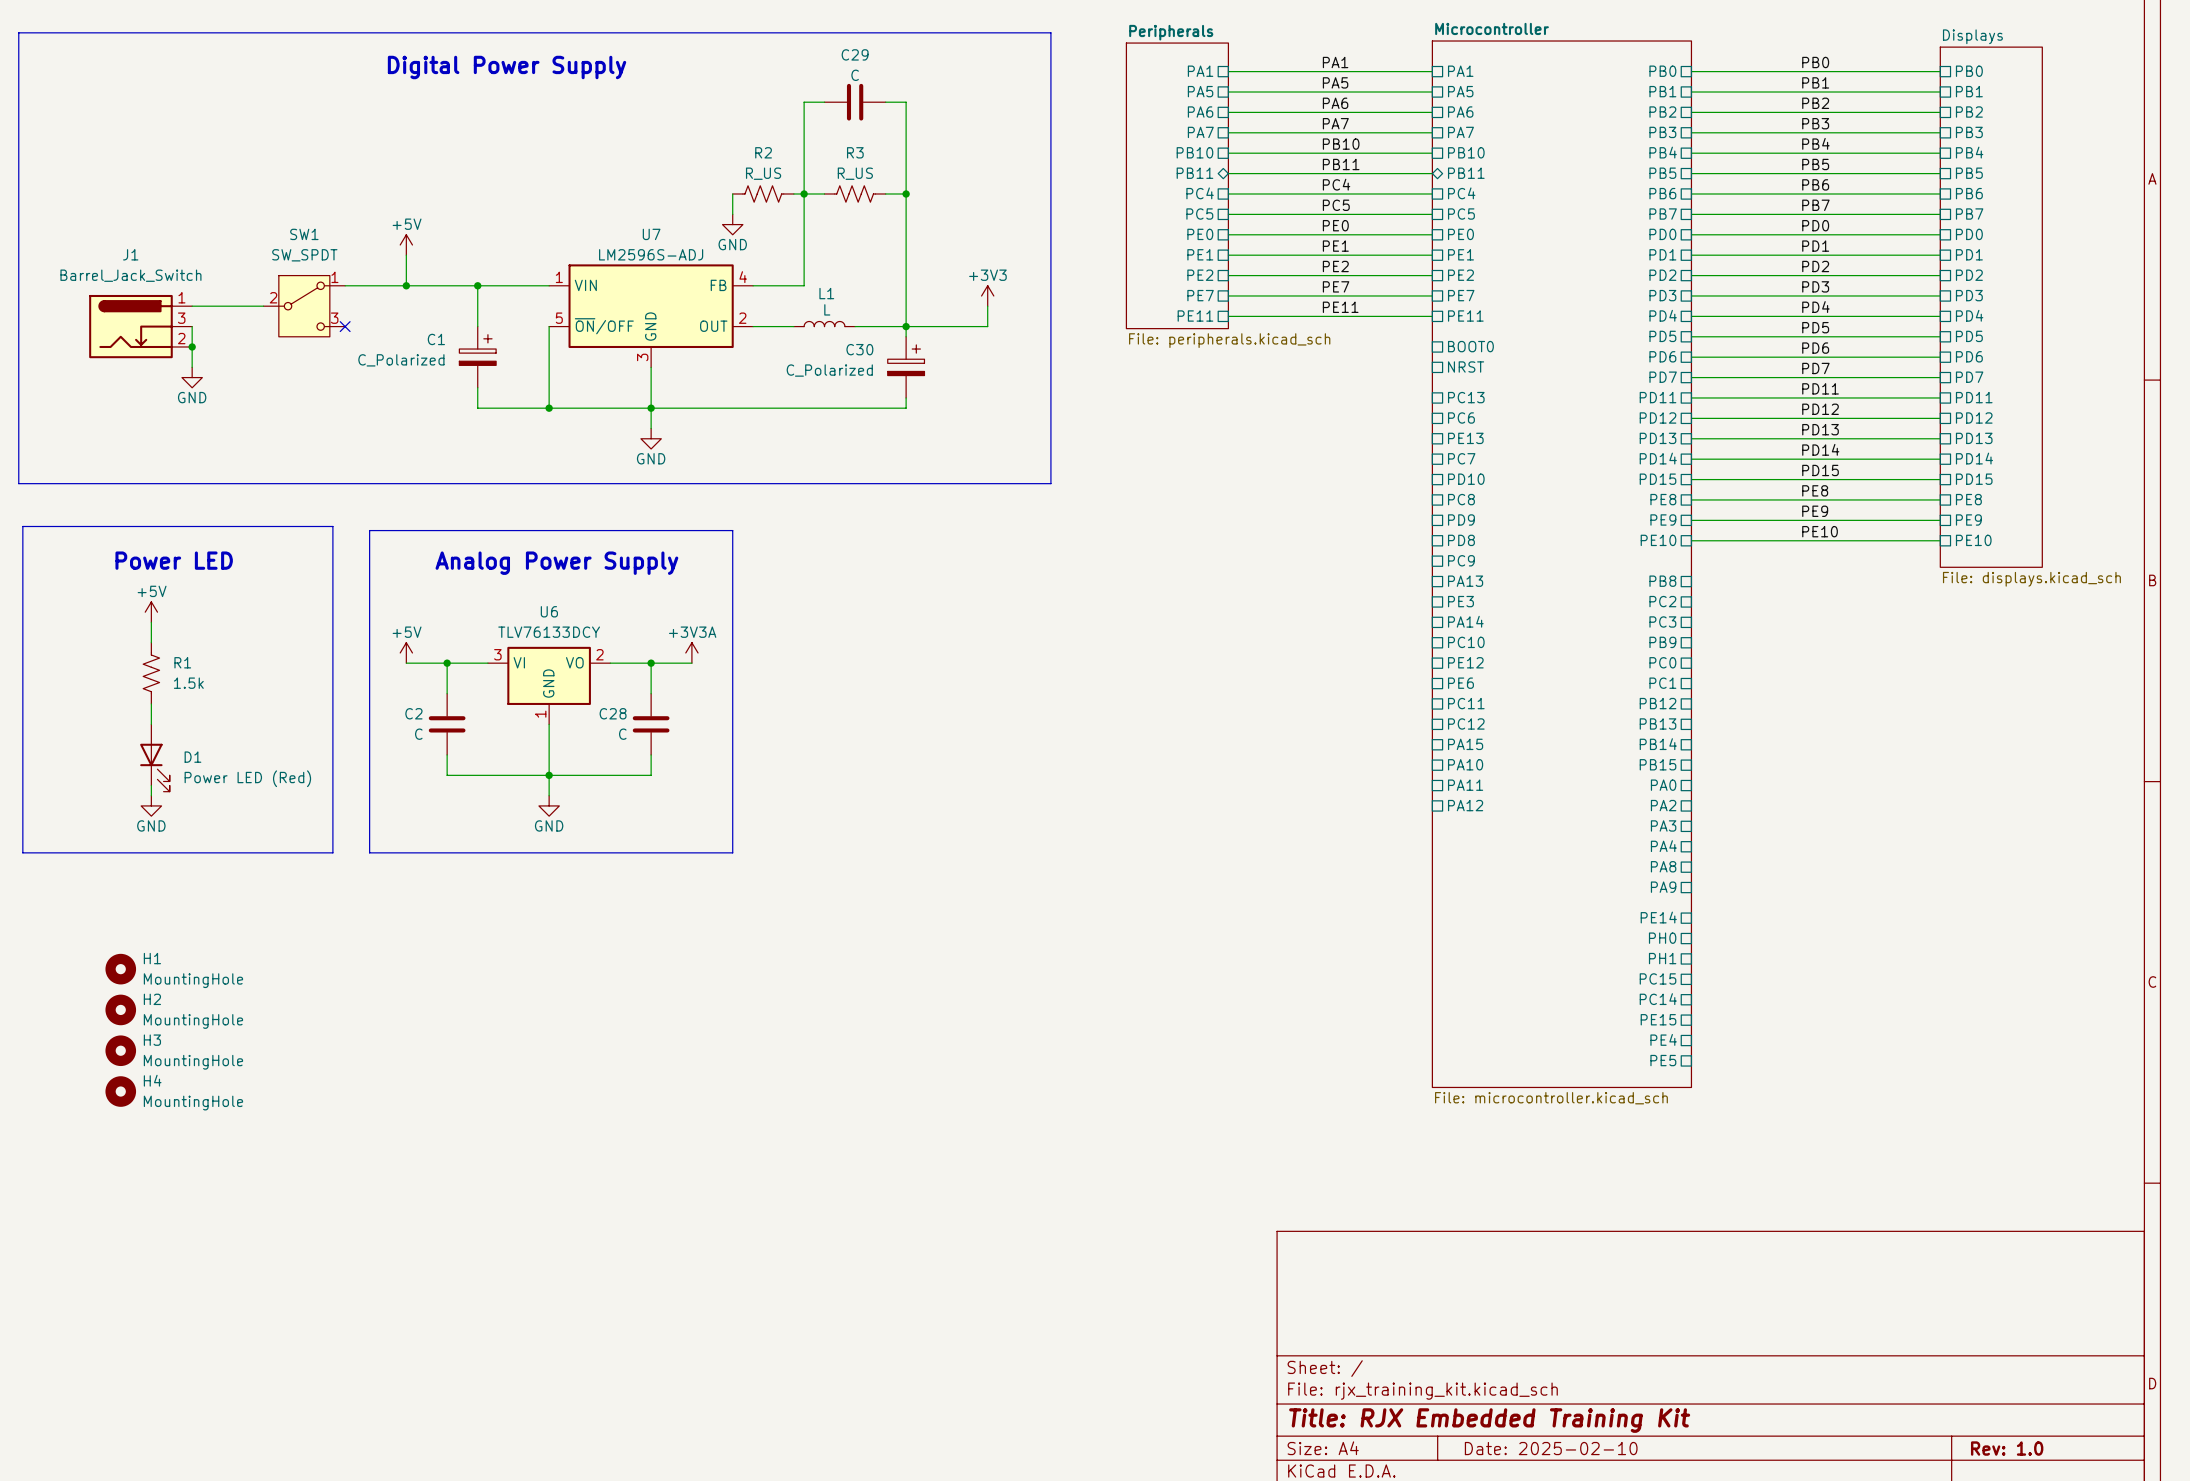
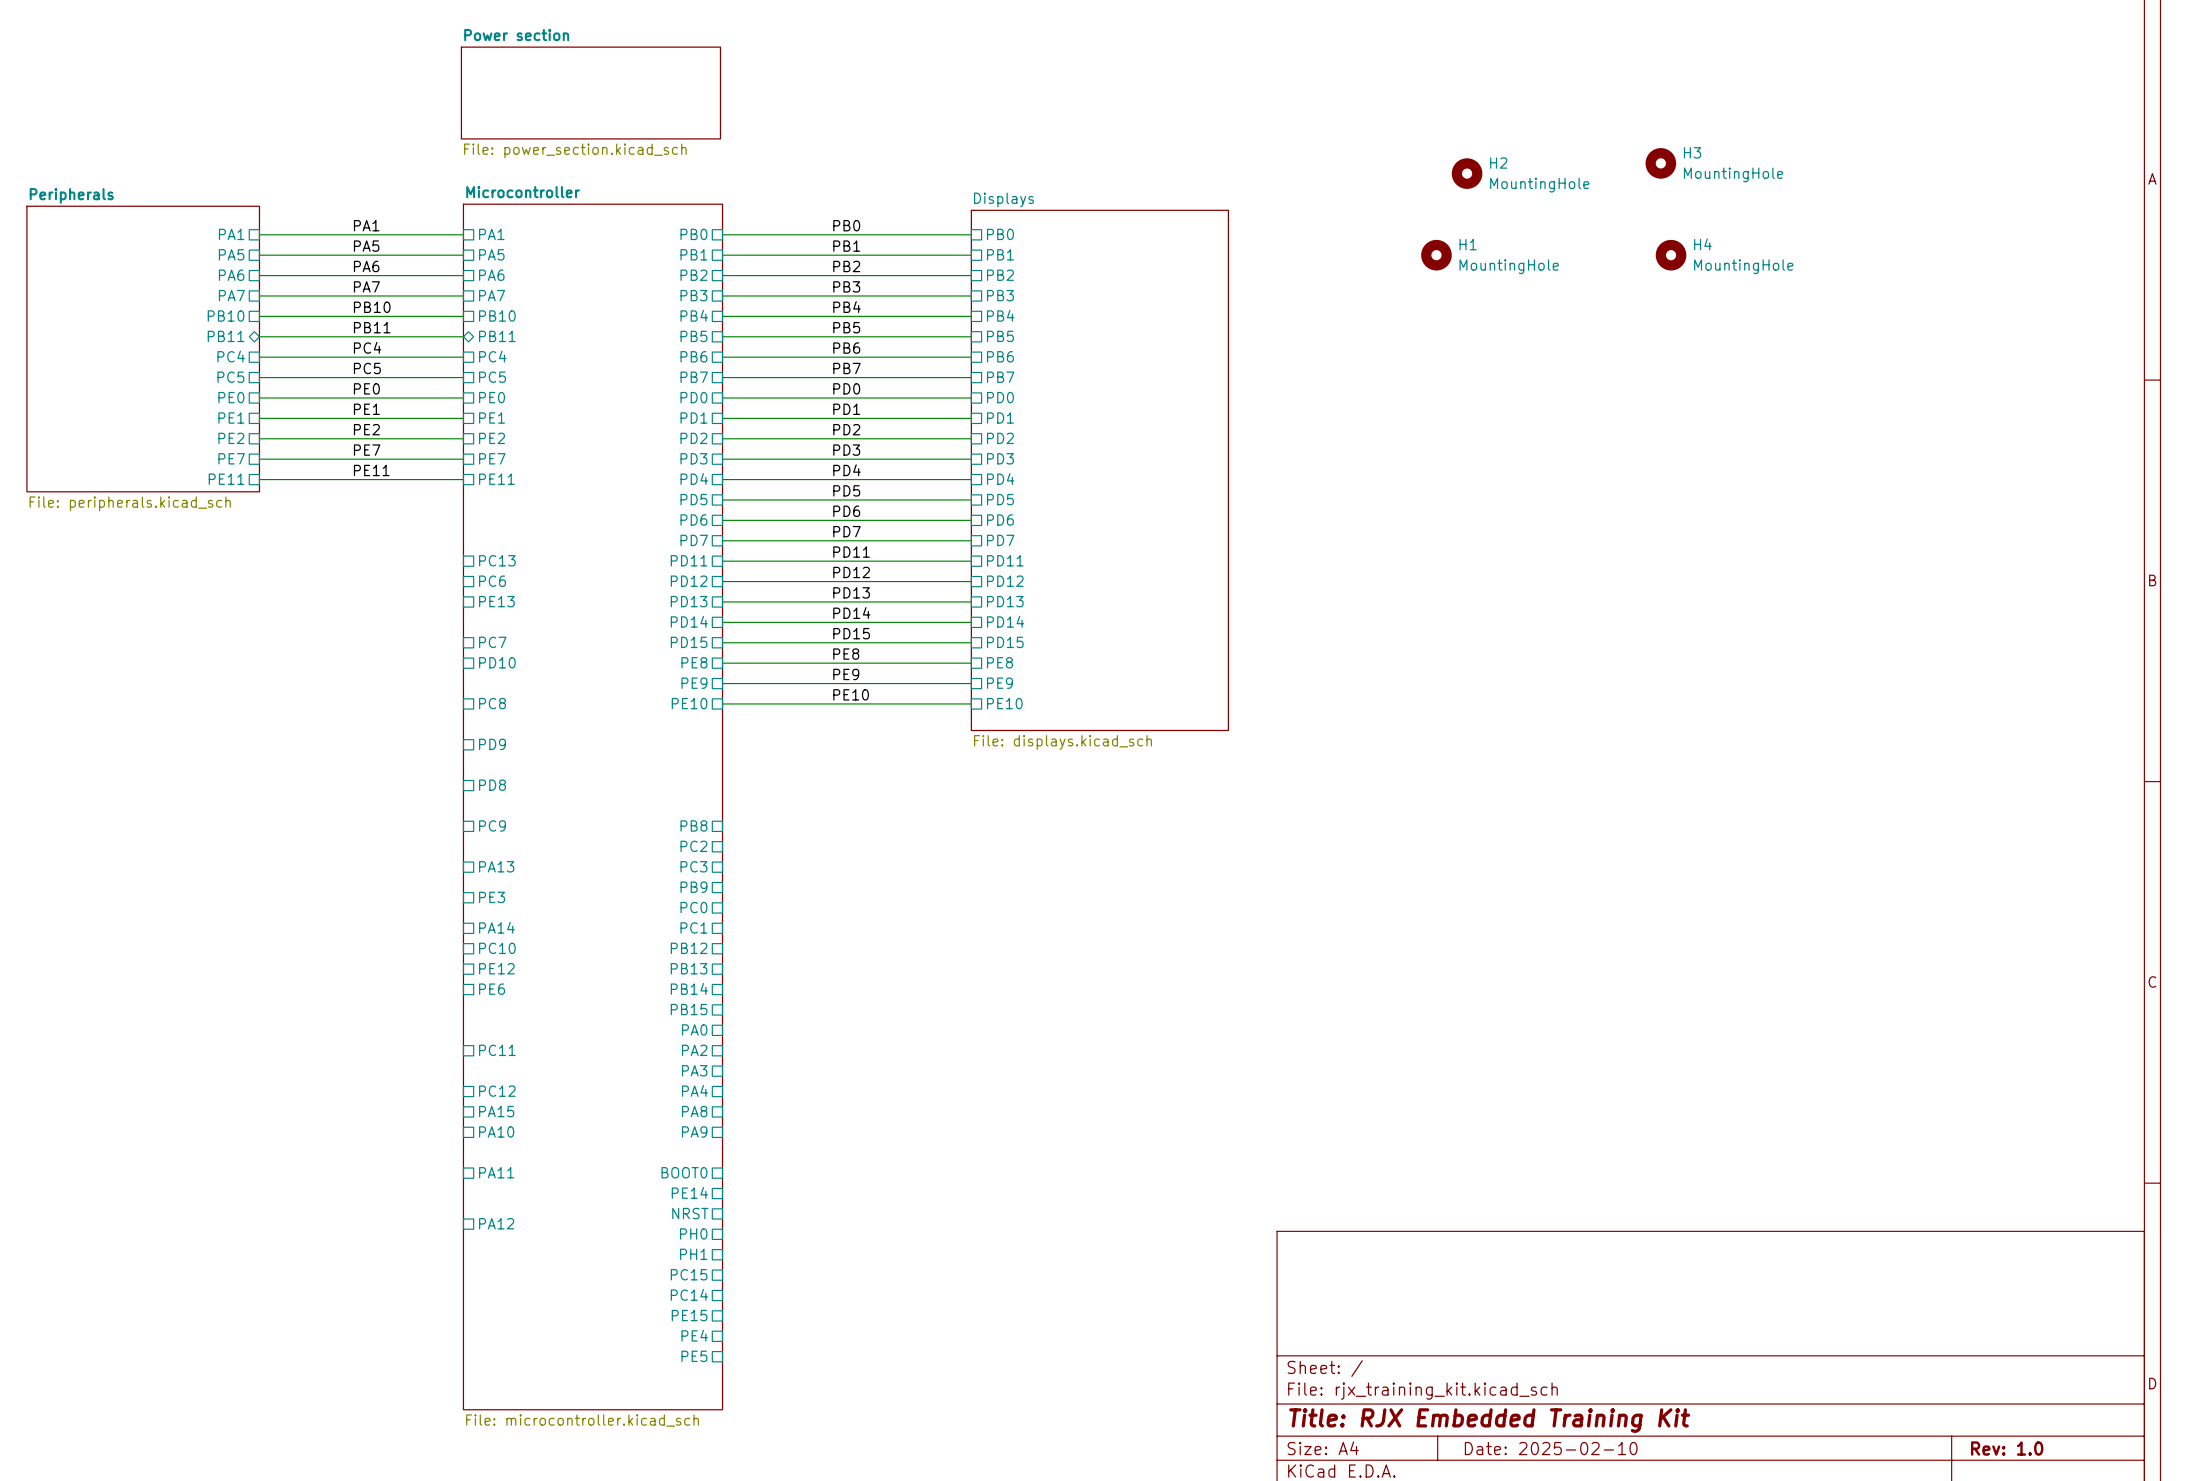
line: (18, 32) (1050, 32) (1050, 483) (18, 483) (18, 32) -> none
label: PA1 (1335, 62) -> none
label: PB0 (1815, 62) -> none
text: Digital Power Supply (507, 67) -> none
sheet pin: PA1 (1200, 71) -> none
wire: (1228, 71) (1432, 71) -> none
sheet pin: PA1 (1460, 71) -> none
sheet pin: PB0 (1662, 71) -> none
wire: (1691, 71) (1940, 71) -> none
sheet pin: PB0 (1969, 71) -> none
label: PA5 (1335, 82) -> none
label: PB1 (1815, 82) -> none
sheet pin: PA5 (1200, 91) -> none
sheet pin: PA5 (1460, 91) -> none
sheet pin: PB1 (1662, 91) -> none
sheet pin: PB1 (1969, 91) -> none
wire: (1228, 92) (1432, 92) -> none
wire: (1691, 92) (1940, 92) -> none
sheet Power section: none -> File: power_section.kicad_sch (590, 93)
wire: (824, 102) (804, 102) (804, 285) (753, 285) -> none
C29: C (855, 102) -> none
wire: (885, 102) (906, 102) (906, 336) -> none
label: PA6 (1335, 103) -> none
label: PB2 (1815, 103) -> none
sheet pin: PA6 (1200, 112) -> none
wire: (1228, 112) (1432, 112) -> none
sheet pin: PA6 (1460, 112) -> none
sheet pin: PB2 (1662, 112) -> none
wire: (1691, 112) (1940, 112) -> none
sheet pin: PB2 (1969, 112) -> none
label: PA7 (1335, 123) -> none
label: PB3 (1815, 123) -> none
sheet pin: PA7 (1200, 132) -> none
wire: (1228, 132) (1432, 132) -> none
sheet pin: PA7 (1460, 132) -> none
sheet pin: PB3 (1662, 132) -> none
wire: (1691, 132) (1940, 132) -> none
sheet pin: PB3 (1969, 132) -> none
label: PB4 (1815, 143) -> none
label: PB10 (1341, 144) -> none
sheet pin: PB10 (1194, 152) -> none
sheet pin: PB10 (1466, 152) -> none
sheet pin: PB4 (1663, 152) -> none
sheet pin: PB4 (1969, 152) -> none
wire: (1228, 153) (1432, 153) -> none
wire: (1691, 153) (1940, 153) -> none
label: PB11 (1341, 164) -> none
label: PB5 (1815, 164) -> none
sheet pin: PB11 (1194, 173) -> none
wire: (1228, 173) (1432, 173) -> none
sheet pin: PB11 (1466, 173) -> none
sheet pin: PB5 (1662, 173) -> none
wire: (1691, 173) (1940, 173) -> none
sheet pin: PB5 (1969, 173) -> none
label: PC4 (1336, 184) -> none
label: PB6 (1815, 184) -> none
sheet Peripherals: File: peripherals.kicad_sch (1177, 185) -> none
wire: (732, 193) (732, 214) -> none
R2: R_US (763, 193) -> none
wire: (793, 193) (824, 193) -> none
junction: (804, 193) -> none
R3: R_US (855, 193) -> none
wire: (885, 193) (906, 193) -> none
junction: (906, 193) -> none
sheet pin: PC4 (1200, 193) -> none
wire: (1228, 193) (1432, 193) -> none
sheet pin: PC4 (1461, 193) -> none
sheet pin: PB6 (1662, 193) -> none
wire: (1691, 193) (1940, 193) -> none
sheet pin: PB6 (1969, 193) -> none
label: PC5 (1336, 205) -> none
label: PB7 (1815, 205) -> none
sheet pin: PC5 (1199, 214) -> none
wire: (1228, 214) (1432, 214) -> none
sheet pin: PC5 (1461, 214) -> none
sheet pin: PB7 (1663, 214) -> none
wire: (1691, 214) (1940, 214) -> none
sheet pin: PB7 (1969, 214) -> none
power symbol: GND (732, 224) -> none
label: none -> PA1 (366, 225)
label: none -> PB0 (846, 225)
label: PE0 (1335, 225) -> none
label: PD0 (1815, 225) -> none
sheet pin: none -> PA1 (231, 234)
wire: none -> (259, 234) (463, 234)
sheet pin: none -> PA1 (491, 234)
sheet pin: none -> PB0 (693, 234)
wire: none -> (722, 234) (971, 234)
sheet pin: none -> PB0 (1000, 234)
sheet pin: PE0 (1200, 234) -> none
wire: (1228, 234) (1432, 234) -> none
sheet pin: PE0 (1460, 234) -> none
sheet pin: PD0 (1662, 234) -> none
wire: (1691, 234) (1940, 234) -> none
sheet pin: PD0 (1969, 234) -> none
power symbol: +5V (406, 244) -> none
label: none -> PA5 (366, 246)
label: none -> PB1 (846, 246)
label: PE1 (1335, 246) -> none
label: PD1 (1815, 246) -> none
sheet pin: none -> PA5 (231, 254)
sheet pin: none -> PA5 (491, 254)
sheet pin: none -> PB1 (693, 254)
sheet pin: none -> PB1 (1000, 254)
sheet pin: PE1 (1200, 254) -> none
sheet pin: PE1 (1460, 254) -> none
sheet pin: PD1 (1662, 254) -> none
sheet pin: PD1 (1969, 254) -> none
wire: none -> (259, 255) (463, 255)
wire: (406, 255) (406, 285) -> none
wire: none -> (722, 255) (971, 255)
wire: (1228, 255) (1432, 255) -> none
wire: (1691, 255) (1940, 255) -> none
label: none -> PA6 (366, 266)
label: none -> PB2 (846, 266)
label: PE2 (1335, 266) -> none
label: PD2 (1815, 266) -> none
sheet pin: none -> PA6 (231, 275)
sheet pin: none -> PA6 (491, 275)
sheet pin: none -> PB2 (693, 275)
wire: none -> (722, 275) (971, 275)
sheet pin: none -> PB2 (1000, 275)
sheet pin: PE2 (1200, 275) -> none
wire: (1228, 275) (1432, 275) -> none
sheet pin: PE2 (1460, 275) -> none
sheet pin: PD2 (1662, 275) -> none
wire: (1691, 275) (1940, 275) -> none
sheet pin: PD2 (1969, 275) -> none
wire: (345, 285) (549, 285) -> (259, 275) (463, 275)
junction: (406, 285) -> none
wire: (477, 285) (477, 326) -> none
junction: (477, 285) -> none
label: none -> PA7 (366, 286)
label: none -> PB3 (846, 286)
label: PE7 (1336, 286) -> none
label: PD3 (1815, 286) -> none
sheet pin: none -> PA7 (231, 295)
wire: none -> (259, 295) (463, 295)
sheet pin: none -> PA7 (492, 295)
sheet pin: none -> PB3 (693, 295)
wire: none -> (722, 295) (971, 295)
power symbol: +3V3 (987, 295) -> none
sheet pin: none -> PB3 (1000, 295)
sheet pin: PE7 (1200, 295) -> none
wire: (1228, 295) (1432, 295) -> none
sheet pin: PE7 (1461, 295) -> none
sheet pin: PD3 (1662, 295) -> none
wire: (1691, 295) (1940, 295) -> none
sheet pin: PD3 (1969, 295) -> none
wire: (192, 306) (263, 306) -> none
SW1: SW_SPDT (304, 306) -> none
wire: (987, 306) (987, 326) (855, 326) -> none
label: none -> PB10 (372, 307)
label: none -> PB4 (846, 307)
label: PE11 (1340, 307) -> none
label: PD4 (1815, 307) -> none
sheet Displays: File: displays.kicad_sch (1991, 307) -> none
U7: LM2596S-ADJ (651, 315) -> none
sheet pin: none -> PB4 (694, 315)
sheet pin: none -> PB4 (1000, 315)
sheet pin: PD4 (1663, 315) -> none
sheet pin: PD4 (1969, 315) -> none
sheet pin: none -> PB10 (226, 316)
wire: none -> (259, 316) (463, 316)
sheet pin: none -> PB10 (497, 316)
wire: none -> (722, 316) (971, 316)
sheet pin: PE11 (1195, 316) -> none
wire: (1228, 316) (1432, 316) -> none
sheet pin: PE11 (1465, 316) -> none
wire: (1691, 316) (1940, 316) -> none
L1: L (824, 324) -> none
J1: Barrel_Jack_Switch (140, 326) -> none
wire: (192, 326) (192, 367) -> none
no-connect mark: (345, 326) -> none
wire: (549, 326) (549, 408) -> none
wire: (753, 326) (793, 326) -> none
junction: (906, 326) -> none
label: none -> PB11 (372, 327)
label: none -> PB5 (846, 327)
label: PD5 (1815, 327) -> none
sheet pin: none -> PB11 (226, 336)
wire: none -> (259, 336) (463, 336)
sheet pin: none -> PB11 (497, 336)
sheet pin: none -> PB5 (693, 336)
wire: none -> (722, 336) (971, 336)
sheet pin: none -> PB5 (1000, 336)
sheet pin: PD5 (1662, 336) -> none
wire: (1691, 336) (1940, 336) -> none
sheet pin: PD5 (1969, 336) -> none
junction: (192, 346) -> none
sheet pin: BOOT0 (1470, 346) -> none
label: none -> PC4 (367, 347)
label: none -> PB6 (846, 348)
label: PD6 (1815, 348) -> none
sheet Peripherals: none -> File: peripherals.kicad_sch (143, 349)
sheet pin: none -> PC4 (231, 356)
sheet pin: none -> PC4 (492, 356)
sheet pin: none -> PB6 (693, 356)
sheet pin: none -> PB6 (1000, 356)
sheet pin: PD6 (1662, 356) -> none
sheet pin: PD6 (1969, 356) -> none
wire: none -> (259, 357) (463, 357)
C1: C_Polarized (477, 357) -> none
wire: none -> (722, 357) (971, 357)
wire: (1691, 357) (1940, 357) -> none
wire: (651, 367) (651, 428) -> none
C30: C_Polarized (906, 367) -> none
sheet pin: NRST (1466, 367) -> none
label: none -> PC5 (367, 368)
label: none -> PB7 (846, 368)
label: PD7 (1815, 368) -> none
power symbol: GND (192, 377) -> none
sheet pin: none -> PC5 (230, 377)
wire: none -> (259, 377) (463, 377)
sheet pin: none -> PC5 (492, 377)
sheet pin: none -> PB7 (694, 377)
wire: none -> (722, 377) (971, 377)
sheet pin: none -> PB7 (1000, 377)
sheet pin: PD7 (1663, 377) -> none
wire: (1691, 377) (1940, 377) -> none
sheet pin: PD7 (1969, 377) -> none
wire: (477, 387) (477, 408) (906, 408) (906, 397) -> none
label: none -> PE0 (366, 388)
label: none -> PD0 (846, 388)
label: PD11 (1820, 388) -> none
sheet pin: none -> PE0 (231, 397)
wire: none -> (259, 397) (463, 397)
sheet pin: none -> PE0 (492, 397)
sheet pin: none -> PD0 (693, 397)
wire: none -> (722, 397) (971, 397)
sheet pin: none -> PD0 (1000, 397)
sheet pin: PC13 (1466, 397) -> none
sheet pin: PD11 (1658, 397) -> none
wire: (1691, 397) (1940, 397) -> none
sheet pin: PD11 (1974, 397) -> none
junction: (549, 408) -> none
junction: (651, 408) -> none
label: none -> PE1 (366, 409)
label: none -> PD1 (846, 409)
label: PD12 (1820, 409) -> none
sheet pin: none -> PE1 (231, 418)
wire: none -> (259, 418) (463, 418)
sheet pin: none -> PE1 (492, 418)
sheet pin: none -> PD1 (693, 418)
wire: none -> (722, 418) (971, 418)
sheet pin: none -> PD1 (1000, 418)
sheet pin: PC6 (1461, 418) -> none
sheet pin: PD12 (1658, 418) -> none
wire: (1691, 418) (1940, 418) -> none
sheet pin: PD12 (1974, 418) -> none
label: none -> PE2 (366, 429)
label: none -> PD2 (846, 429)
label: PD13 (1820, 429) -> none
sheet pin: none -> PE2 (231, 438)
wire: none -> (259, 438) (463, 438)
sheet pin: none -> PE2 (492, 438)
power symbol: GND (651, 438) -> none
sheet pin: none -> PD2 (693, 438)
wire: none -> (722, 438) (971, 438)
sheet pin: none -> PD2 (1000, 438)
sheet pin: PE13 (1465, 438) -> none
sheet pin: PD13 (1658, 438) -> none
wire: (1691, 438) (1940, 438) -> none
sheet pin: PD13 (1974, 438) -> none
label: PD14 (1820, 449) -> none
label: none -> PE7 (367, 450)
label: none -> PD3 (846, 450)
sheet pin: none -> PE7 (231, 458)
sheet pin: none -> PE7 (492, 458)
sheet pin: none -> PD3 (693, 458)
sheet pin: none -> PD3 (1000, 458)
sheet pin: PC7 (1461, 458) -> none
sheet pin: PD14 (1658, 458) -> none
sheet pin: PD14 (1974, 458) -> none
wire: none -> (259, 459) (463, 459)
wire: none -> (722, 459) (971, 459)
wire: (1691, 459) (1940, 459) -> none
label: none -> PE11 (371, 470)
label: none -> PD4 (846, 470)
sheet Displays: none -> File: displays.kicad_sch (1099, 470)
label: PD15 (1820, 470) -> none
sheet pin: none -> PD4 (694, 478)
sheet pin: none -> PD4 (1000, 478)
sheet pin: none -> PE11 (226, 479)
wire: none -> (259, 479) (463, 479)
sheet pin: none -> PE11 (496, 479)
wire: none -> (722, 479) (971, 479)
sheet pin: PD10 (1466, 479) -> none
sheet pin: PD15 (1658, 479) -> none
wire: (1691, 479) (1940, 479) -> none
sheet pin: PD15 (1974, 479) -> none
label: none -> PD5 (846, 490)
label: PE8 (1815, 490) -> none
sheet pin: none -> PD5 (693, 499)
wire: none -> (722, 499) (971, 499)
sheet pin: none -> PD5 (1000, 499)
sheet pin: PC8 (1461, 499) -> none
sheet pin: PE8 (1663, 499) -> none
wire: (1691, 499) (1940, 499) -> none
sheet pin: PE8 (1968, 499) -> none
label: none -> PD6 (846, 511)
label: PE9 (1815, 511) -> none
sheet pin: none -> PD6 (693, 519)
sheet pin: none -> PD6 (1000, 519)
sheet pin: PD9 (1461, 519) -> none
sheet pin: PE9 (1663, 519) -> none
sheet pin: PE9 (1968, 519) -> none
wire: none -> (722, 520) (971, 520)
wire: (1691, 520) (1940, 520) -> none
line: (22, 526) (332, 526) (332, 852) (22, 852) (22, 526) -> none
line: (369, 530) (732, 530) (732, 852) (369, 852) (369, 530) -> none
label: none -> PD7 (846, 531)
label: PE10 (1820, 531) -> none
sheet pin: none -> PD7 (694, 540)
wire: none -> (722, 540) (971, 540)
sheet pin: none -> PD7 (1000, 540)
sheet pin: PD8 (1461, 540) -> none
sheet pin: PE10 (1658, 540) -> none
wire: (1691, 540) (1940, 540) -> none
sheet pin: PE10 (1973, 540) -> none
label: none -> PD11 (851, 552)
text: Power LED (174, 560) -> none
sheet pin: none -> PC13 (497, 560)
sheet pin: none -> PD11 (689, 560)
sheet pin: none -> PD11 (1005, 560)
sheet pin: PC9 (1461, 560) -> none
wire: none -> (722, 561) (971, 561)
text: Analog Power Supply (556, 563) -> none
sheet Microcontroller: File: microcontroller.kicad_sch (1561, 564) -> none
label: none -> PD12 (851, 572)
sheet pin: none -> PC6 (492, 581)
sheet pin: none -> PD12 (689, 581)
wire: none -> (722, 581) (971, 581)
sheet pin: none -> PD12 (1005, 581)
sheet pin: PA13 (1465, 581) -> none
sheet pin: PB8 (1662, 581) -> none
label: none -> PD13 (851, 592)
sheet pin: none -> PE13 (496, 601)
sheet pin: none -> PD13 (689, 601)
wire: none -> (722, 601) (971, 601)
sheet pin: none -> PD13 (1005, 601)
sheet pin: PE3 (1460, 601) -> none
sheet pin: PC2 (1662, 601) -> none
power symbol: +5V (151, 612) -> none
label: none -> PD14 (851, 613)
sheet pin: none -> PD14 (689, 621)
sheet pin: none -> PD14 (1005, 621)
sheet pin: PA14 (1465, 621) -> none
sheet pin: PC3 (1662, 621) -> none
wire: (151, 622) (151, 642) -> none
wire: none -> (722, 622) (971, 622)
label: none -> PD15 (851, 633)
sheet pin: none -> PC7 (492, 642)
sheet pin: none -> PD15 (689, 642)
wire: none -> (722, 642) (971, 642)
sheet pin: none -> PD15 (1005, 642)
sheet pin: PC10 (1466, 642) -> none
sheet pin: PB9 (1662, 642) -> none
power symbol: +5V (406, 652) -> none
power symbol: +3V3A (691, 652) -> none
label: none -> PE8 (846, 654)
sheet pin: none -> PD10 (497, 662)
sheet pin: none -> PE8 (694, 662)
sheet pin: none -> PE8 (999, 662)
sheet pin: PE12 (1465, 662) -> none
sheet pin: PC0 (1662, 662) -> none
wire: (406, 663) (487, 663) -> none
wire: (447, 663) (447, 693) -> none
junction: (447, 663) -> none
wire: (610, 663) (691, 663) -> none
wire: (651, 663) (651, 693) -> none
junction: (651, 663) -> none
wire: none -> (722, 663) (971, 663)
R1: 1.5k (151, 673) -> none
label: none -> PE9 (846, 674)
sheet pin: none -> PE9 (694, 683)
wire: none -> (722, 683) (971, 683)
sheet pin: none -> PE9 (999, 683)
sheet pin: PE6 (1460, 683) -> none
sheet pin: PC1 (1662, 683) -> none
U6: TLV76133DCY (549, 685) -> none
label: none -> PE10 (851, 694)
wire: (151, 703) (151, 724) -> none
sheet pin: none -> PC8 (492, 703)
sheet pin: none -> PE10 (689, 703)
wire: none -> (722, 703) (971, 703)
sheet pin: none -> PE10 (1004, 703)
sheet pin: PC11 (1466, 703) -> none
sheet pin: PB12 (1658, 703) -> none
sheet pin: PC12 (1466, 723) -> none
sheet pin: PB13 (1658, 723) -> none
C2: C (447, 724) -> none
wire: (549, 724) (549, 795) -> none
C28: C (651, 724) -> none
sheet pin: none -> PD9 (492, 744)
sheet pin: PA15 (1465, 744) -> none
sheet pin: PB14 (1658, 744) -> none
wire: (447, 754) (447, 775) (651, 775) (651, 754) -> none
D1: Power LED (Red) (154, 758) -> none
sheet pin: PA10 (1465, 764) -> none
sheet pin: PB15 (1658, 764) -> none
junction: (549, 775) -> none
wire: (151, 785) (151, 795) -> none
sheet pin: none -> PD8 (492, 785)
sheet pin: PA11 (1465, 785) -> none
sheet pin: PA0 (1663, 785) -> none
power symbol: GND (151, 805) -> none
power symbol: GND (549, 805) -> none
sheet pin: PA12 (1465, 805) -> none
sheet pin: PA2 (1663, 805) -> none
sheet Microcontroller: none -> File: microcontroller.kicad_sch (592, 806)
sheet pin: none -> PC9 (492, 825)
sheet pin: none -> PB8 (693, 825)
sheet pin: PA3 (1663, 825) -> none
sheet pin: none -> PC2 (693, 846)
sheet pin: PA4 (1663, 846) -> none
sheet pin: none -> PA13 (496, 866)
sheet pin: none -> PC3 (693, 866)
sheet pin: PA8 (1663, 866) -> none
sheet pin: none -> PB9 (693, 887)
sheet pin: PA9 (1663, 887) -> none
sheet pin: none -> PE3 (492, 897)
sheet pin: none -> PC0 (693, 907)
sheet pin: PE14 (1658, 917) -> none
sheet pin: none -> PA14 (496, 927)
sheet pin: none -> PC1 (693, 927)
sheet pin: PH0 (1662, 938) -> none
sheet pin: none -> PC10 (497, 948)
sheet pin: none -> PB12 (689, 948)
sheet pin: PH1 (1662, 958) -> none
sheet pin: none -> PE12 (496, 968)
sheet pin: none -> PB13 (689, 968)
H1 position: (120, 969) -> (1436, 255)
sheet pin: PC15 (1658, 978) -> none
sheet pin: none -> PB14 (689, 988)
sheet pin: none -> PE6 (492, 989)
sheet pin: PC14 (1658, 999) -> none
H2 position: (120, 1009) -> (1467, 173)
sheet pin: none -> PB15 (689, 1009)
sheet pin: PE15 (1658, 1019) -> none
sheet pin: none -> PA0 (694, 1029)
sheet pin: PE4 (1663, 1039) -> none
H3 position: (120, 1050) -> (1660, 163)
sheet pin: none -> PC11 (497, 1050)
sheet pin: none -> PA2 (694, 1050)
sheet pin: PE5 (1663, 1060) -> none
sheet pin: none -> PA3 (694, 1070)
sheet pin: none -> PA4 (694, 1090)
H4 position: (120, 1091) -> (1671, 255)
sheet pin: none -> PC12 (497, 1091)
sheet pin: none -> PA15 (496, 1111)
sheet pin: none -> PA8 (694, 1111)
sheet pin: none -> PA10 (496, 1131)
sheet pin: none -> PA9 (694, 1131)
sheet pin: none -> PA11 (496, 1172)
sheet pin: none -> BOOT0 (684, 1172)
sheet pin: none -> PE14 (689, 1192)
sheet pin: none -> NRST (690, 1213)
sheet pin: none -> PA12 (496, 1223)
sheet pin: none -> PH0 (693, 1233)
sheet pin: none -> PH1 (693, 1254)
sheet pin: none -> PC15 (689, 1274)
sheet pin: none -> PC14 (689, 1294)
sheet pin: none -> PE15 (689, 1315)
sheet pin: none -> PE4 (694, 1335)
sheet pin: none -> PE5 (694, 1356)

